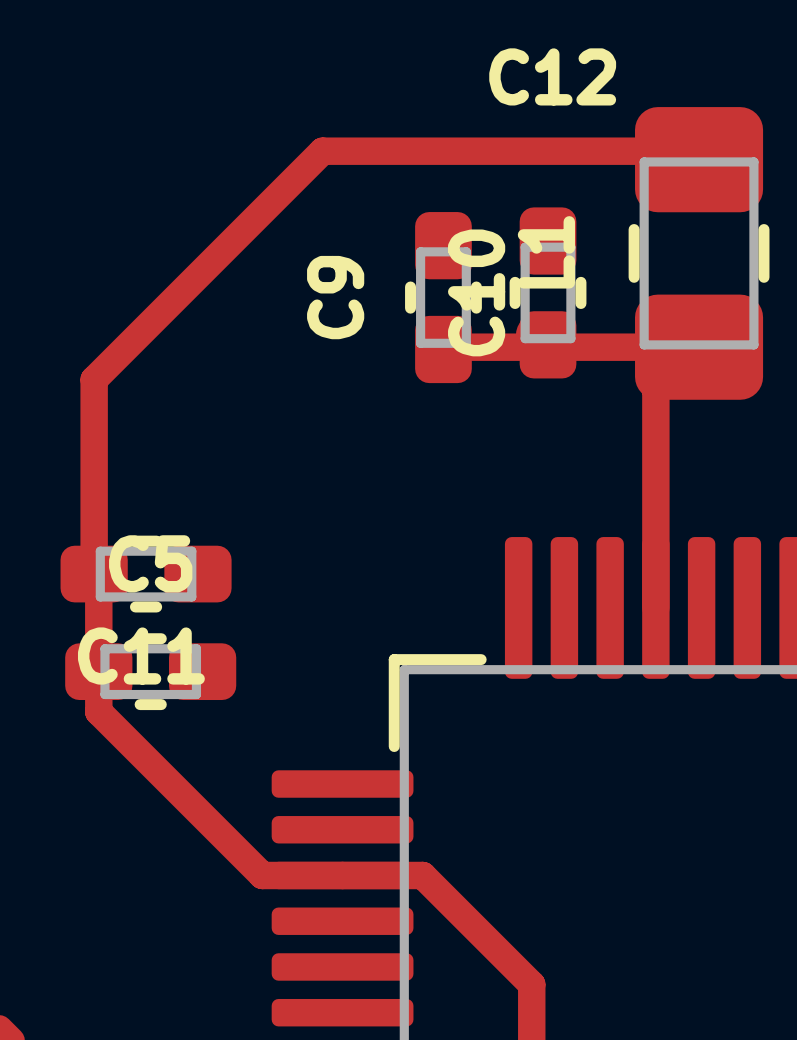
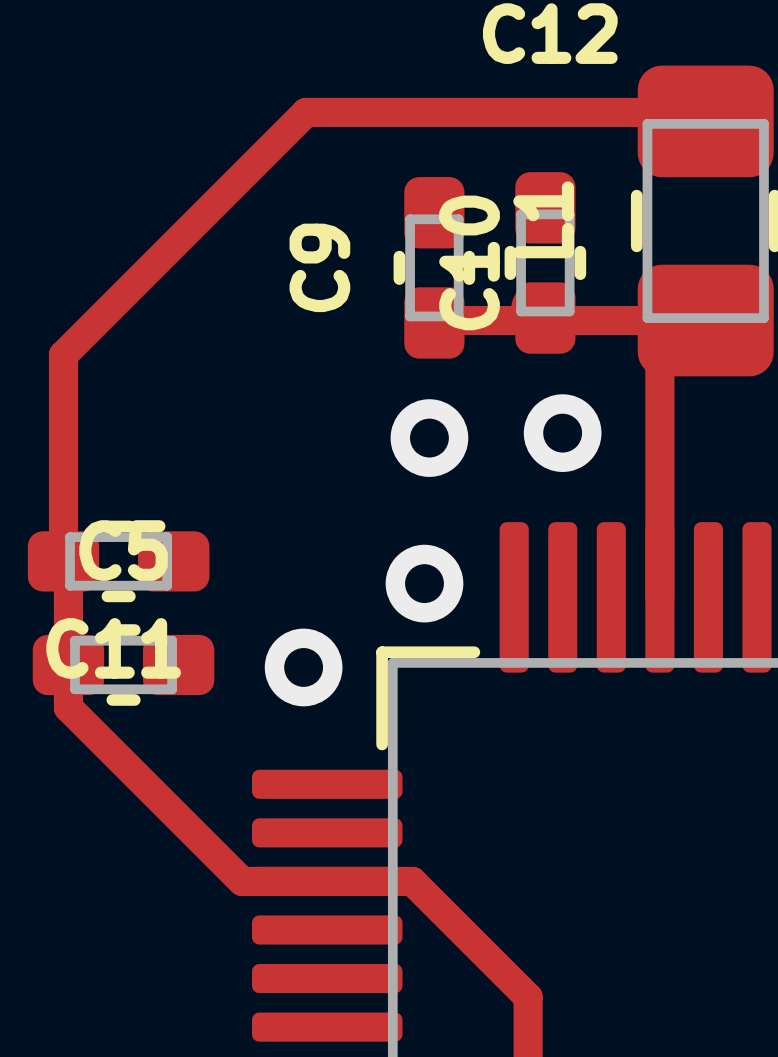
via: none -> (562, 433)
via: none -> (429, 438)
via: none -> (424, 583)
via: none -> (303, 667)

